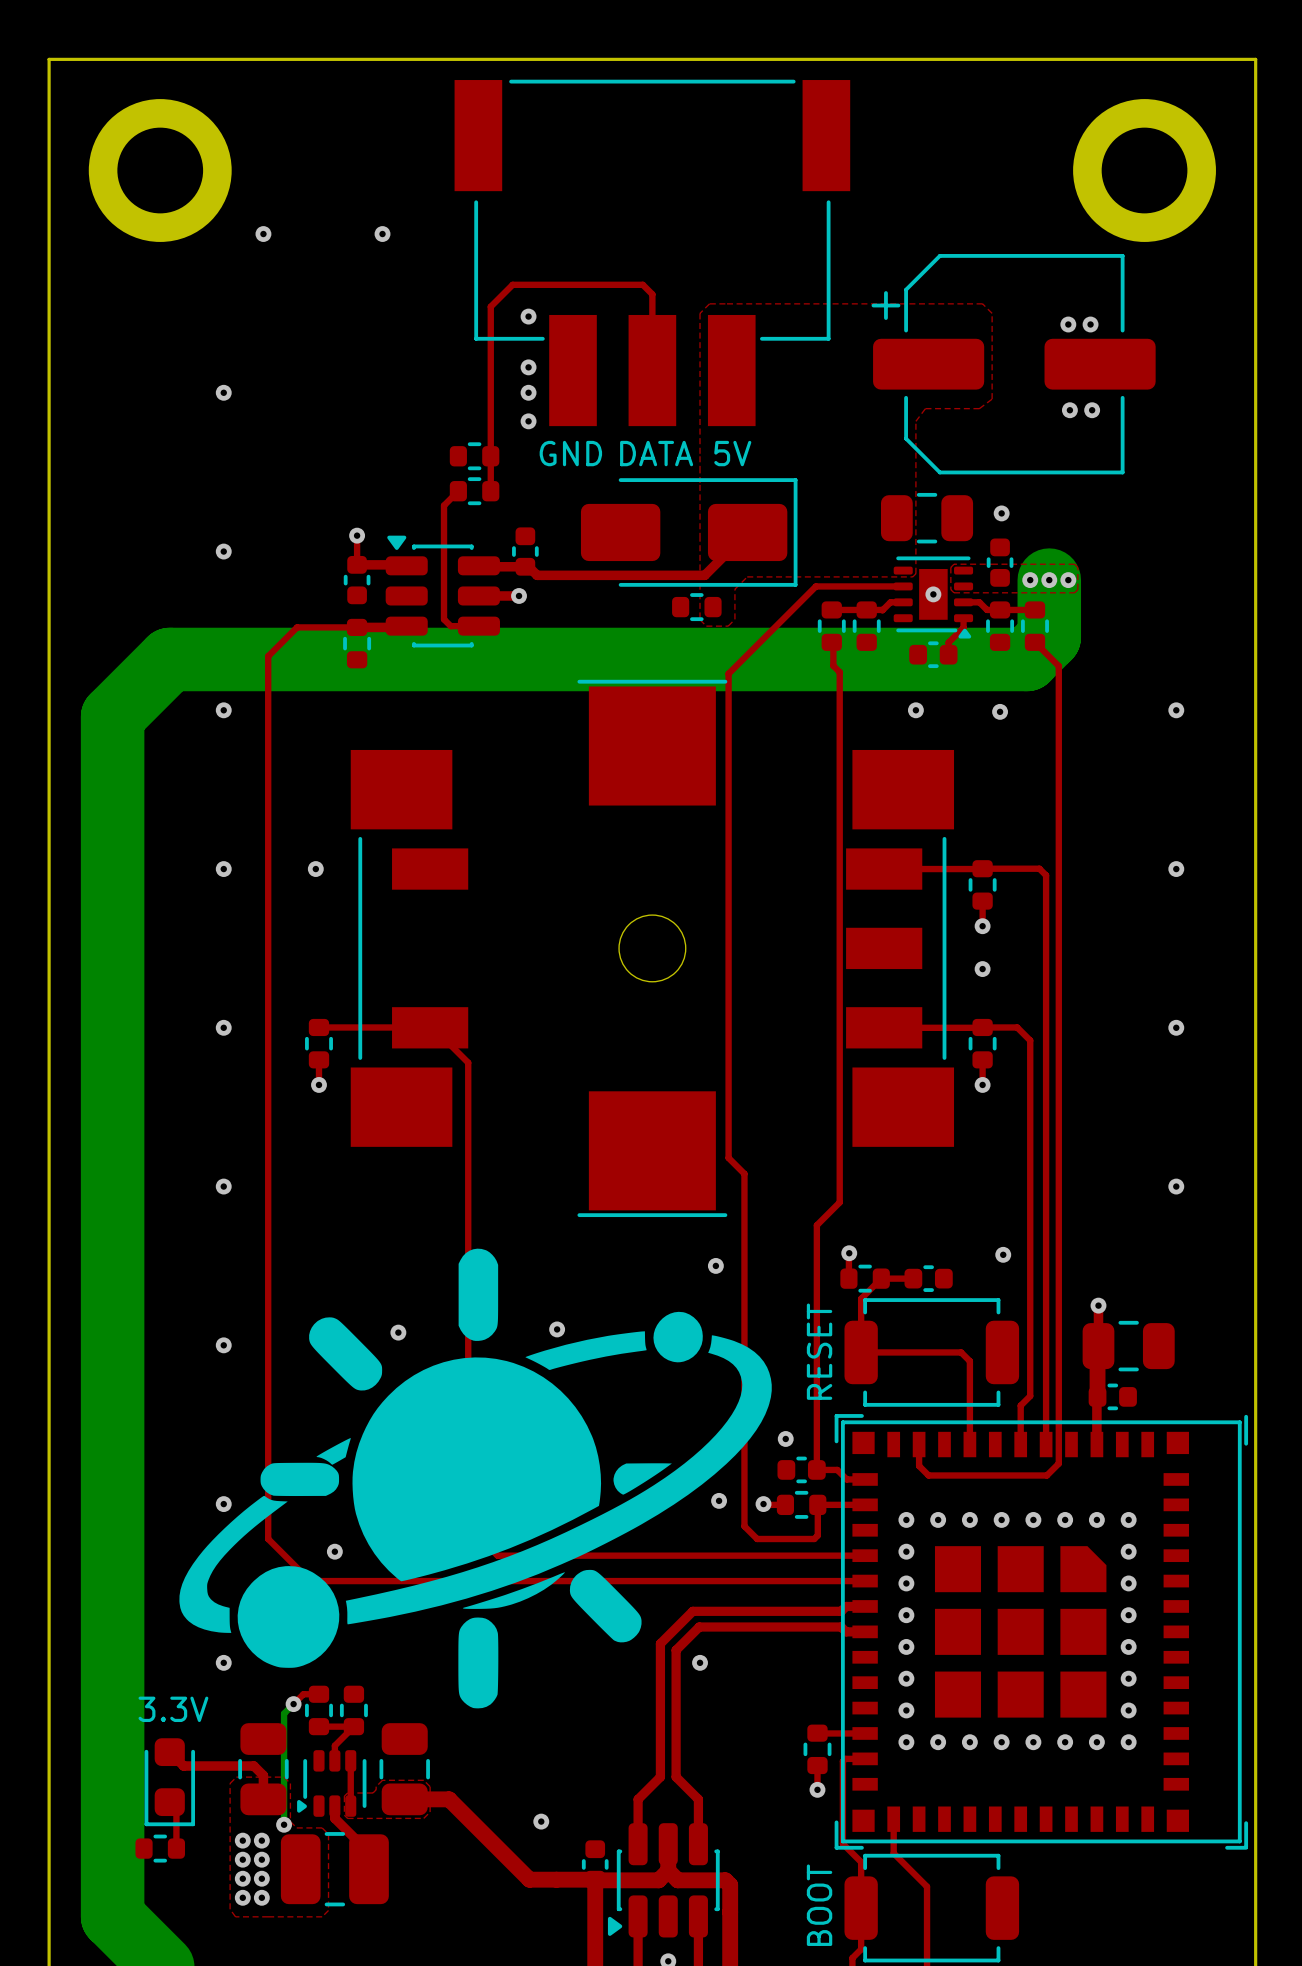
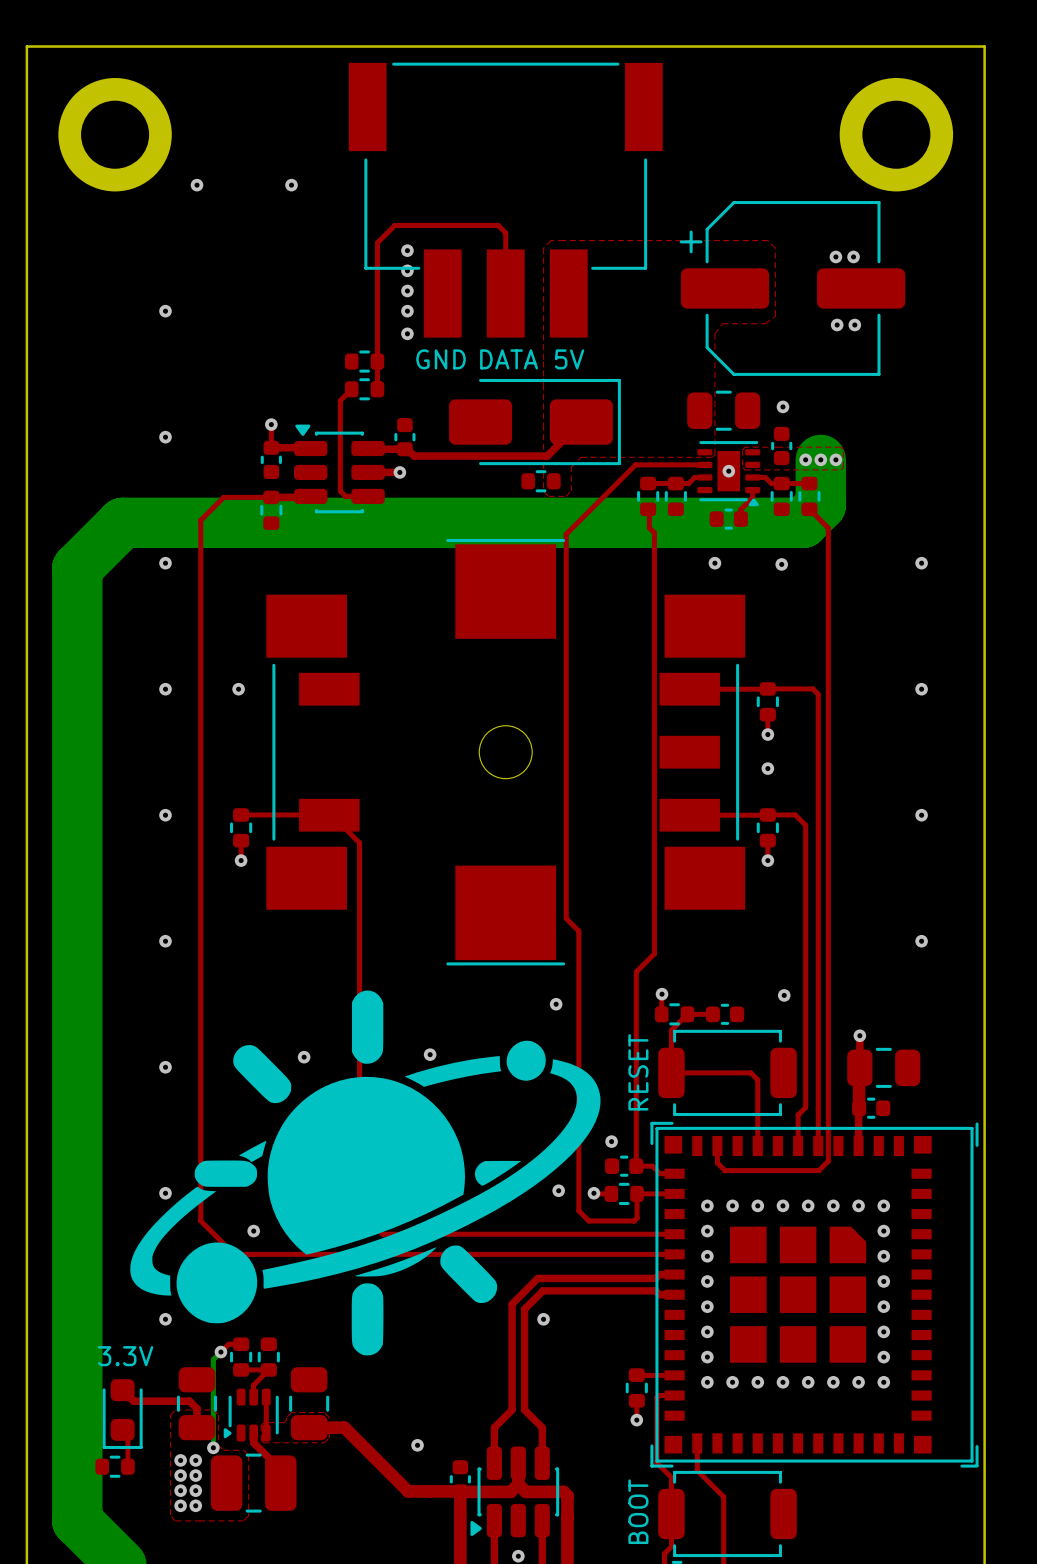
via: none -> (407, 270)

